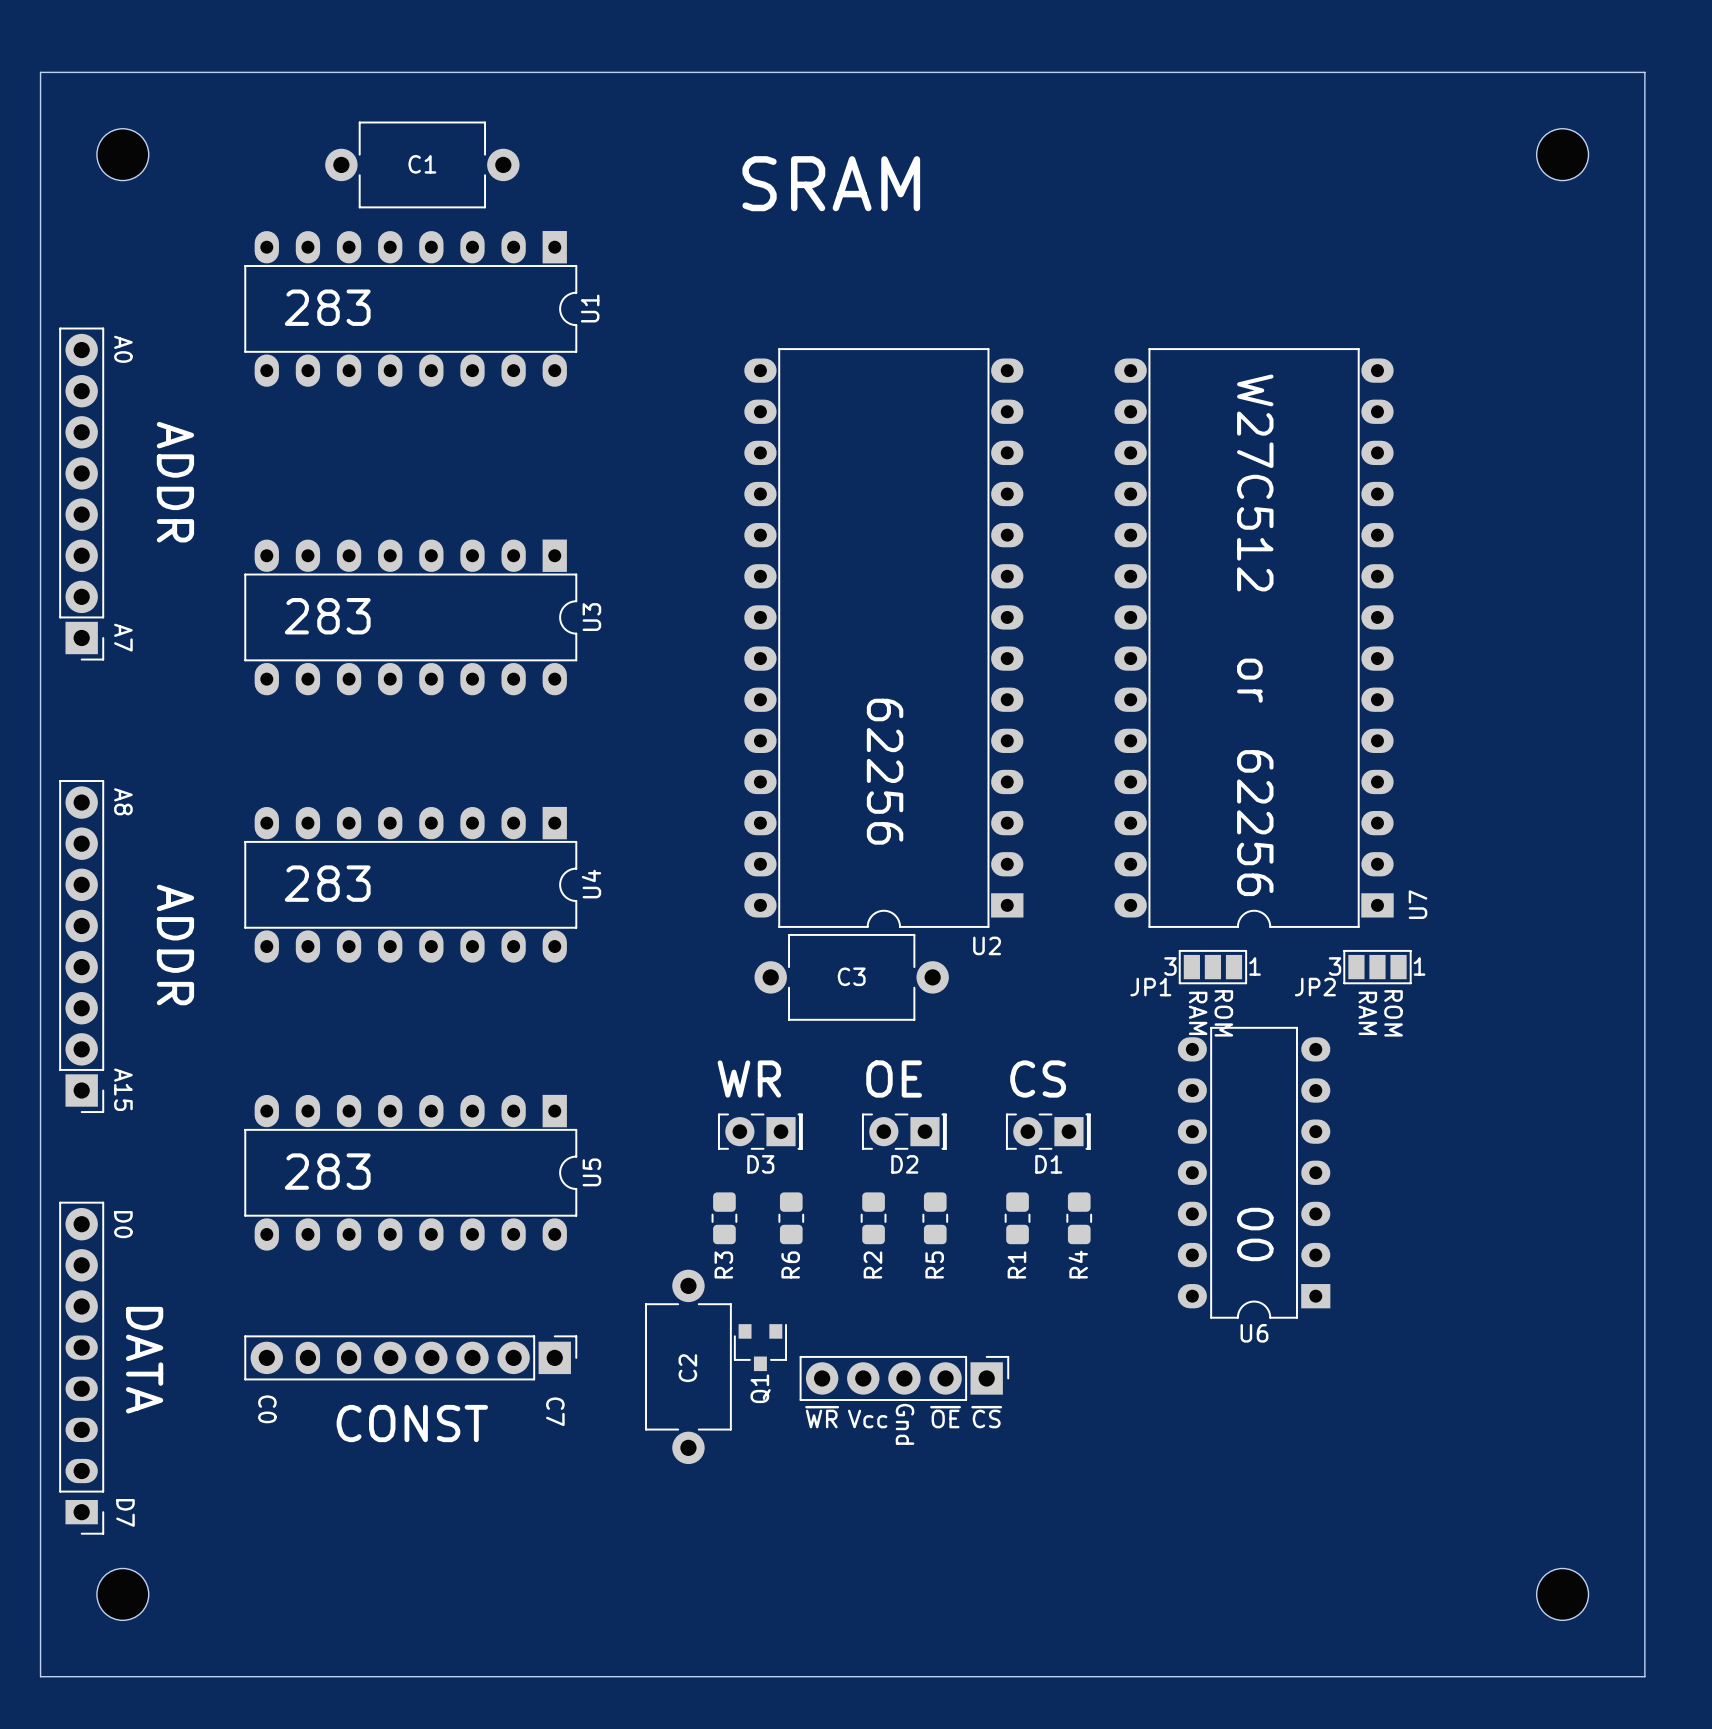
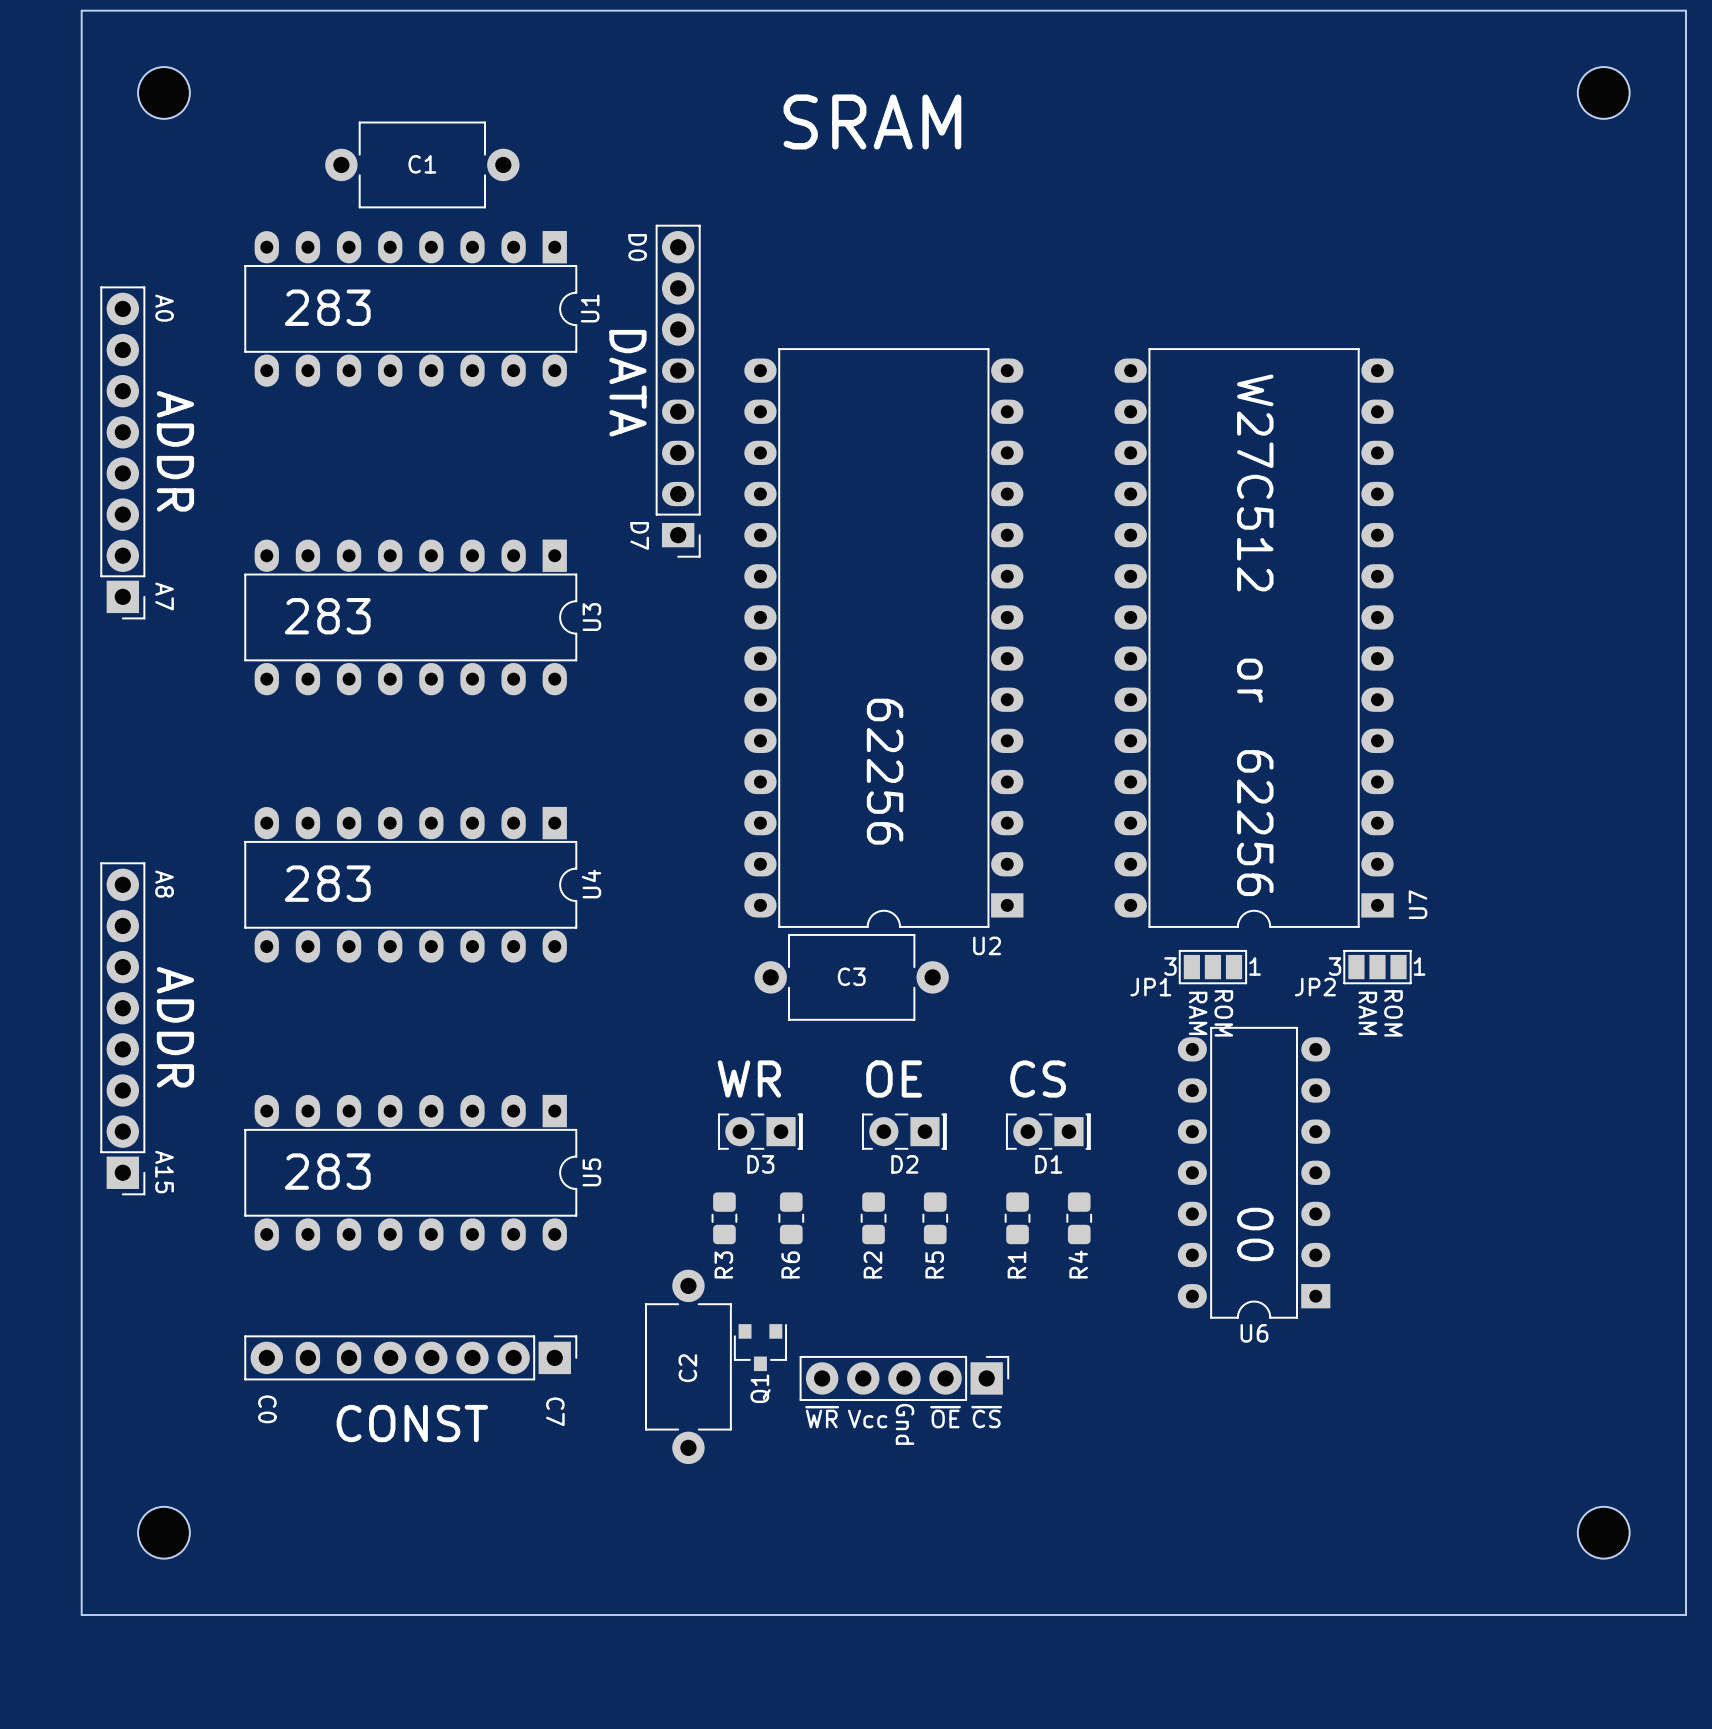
board edge: (40, 72) (40, 1676) (1644, 1676) (1644, 72) (40, 72) -> (81, 10) (81, 1614) (1686, 1614) (1686, 10) (81, 10)
part position: (122, 154) -> (163, 92)
part position: (1562, 154) -> (1603, 92)
text position: SRAM (831, 183) -> SRAM (872, 121)
text: none -> D0 (637, 247)
text position: A0 (123, 349) -> A0 (164, 308)
text: none -> DATA (627, 383)
part: none -> (678, 391)
text position: ADDR (175, 482) -> ADDR (175, 451)
part position: (81, 494) -> (122, 452)
text: none -> D7 (639, 535)
text position: A7 (123, 637) -> A7 (164, 596)
text position: A8 (123, 801) -> A8 (164, 884)
text position: ADDR (175, 944) -> ADDR (175, 1027)
part position: (81, 946) -> (122, 1028)
text position: A15 (123, 1089) -> A15 (164, 1172)
text: D0 (123, 1224) -> none
text: DATA (144, 1360) -> none
part: (81, 1368) -> none
text: D7 (125, 1512) -> none
part position: (122, 1594) -> (163, 1532)
part position: (1562, 1594) -> (1603, 1532)

